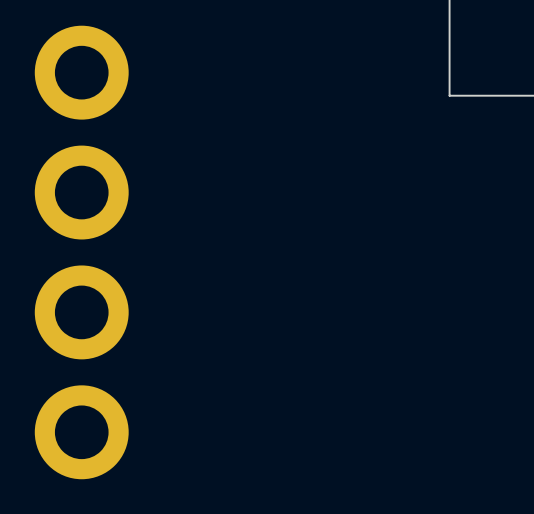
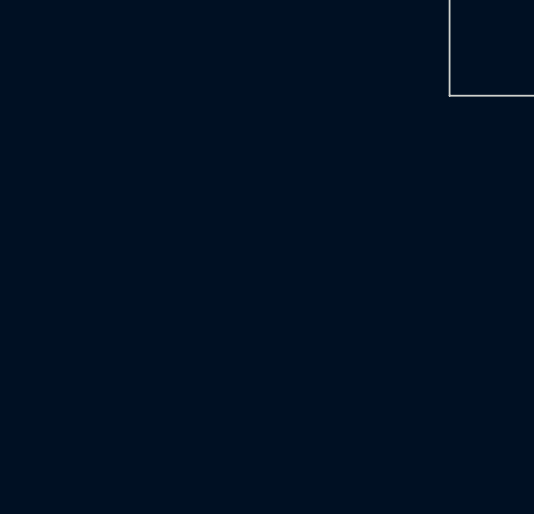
part: (81, 72) -> none
part: (81, 192) -> none
part: (81, 312) -> none
part: (81, 432) -> none

